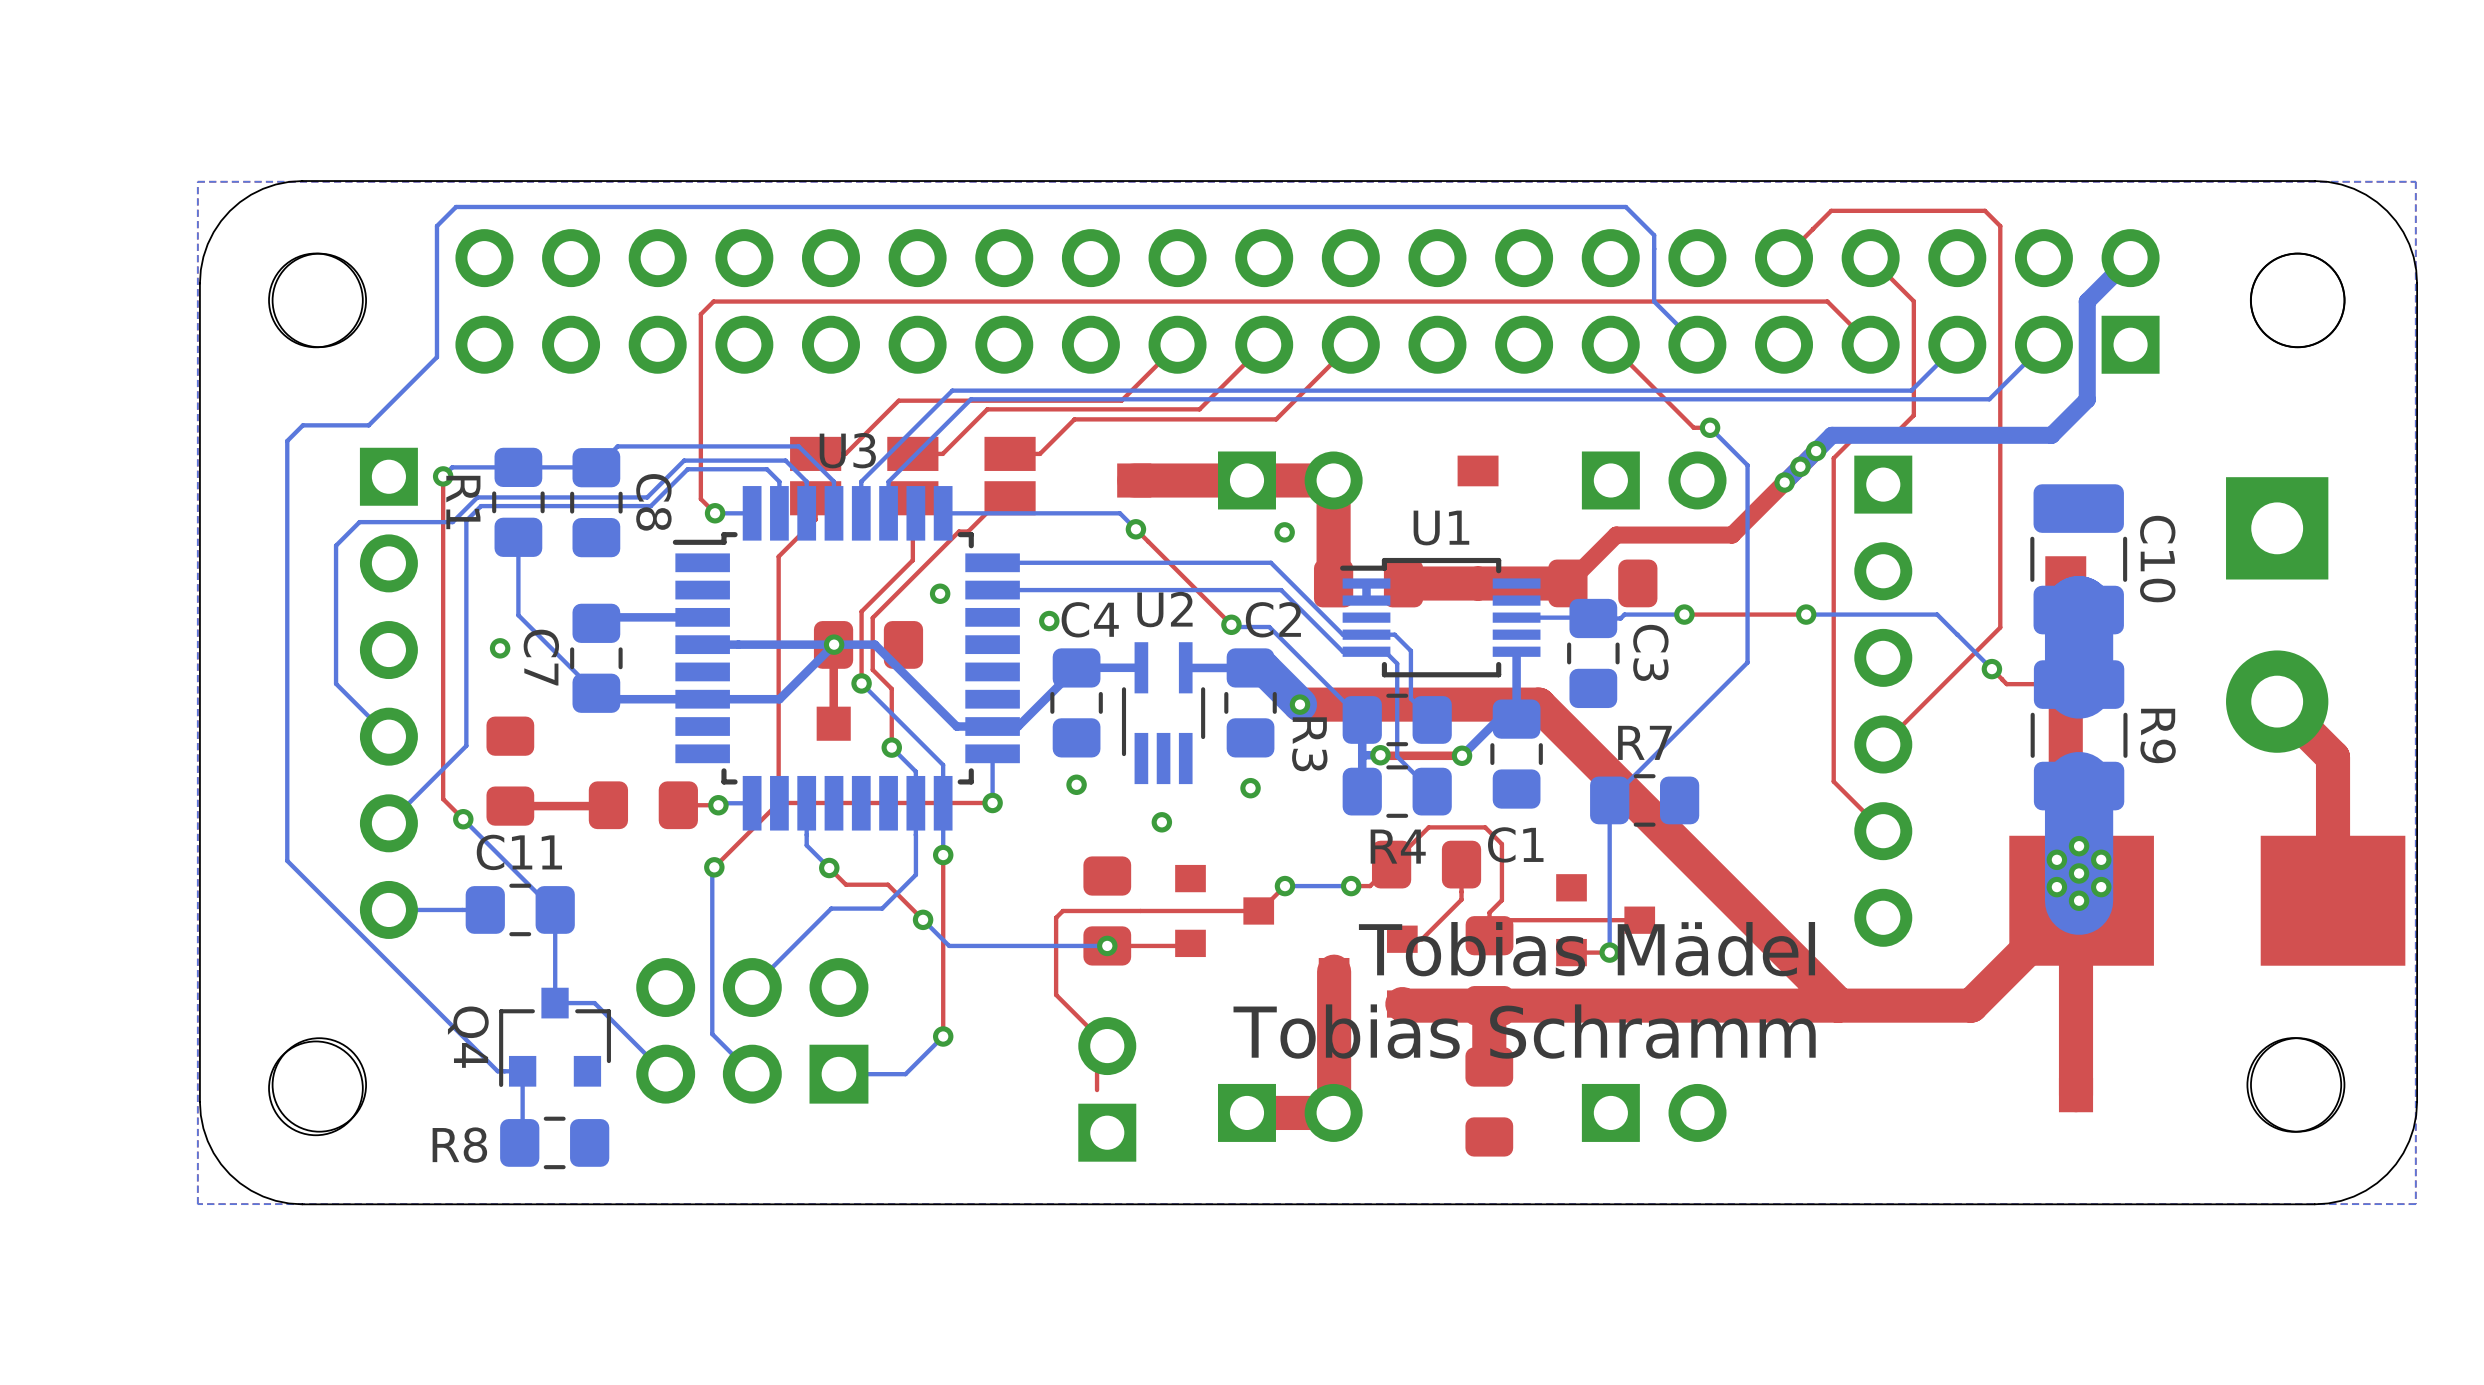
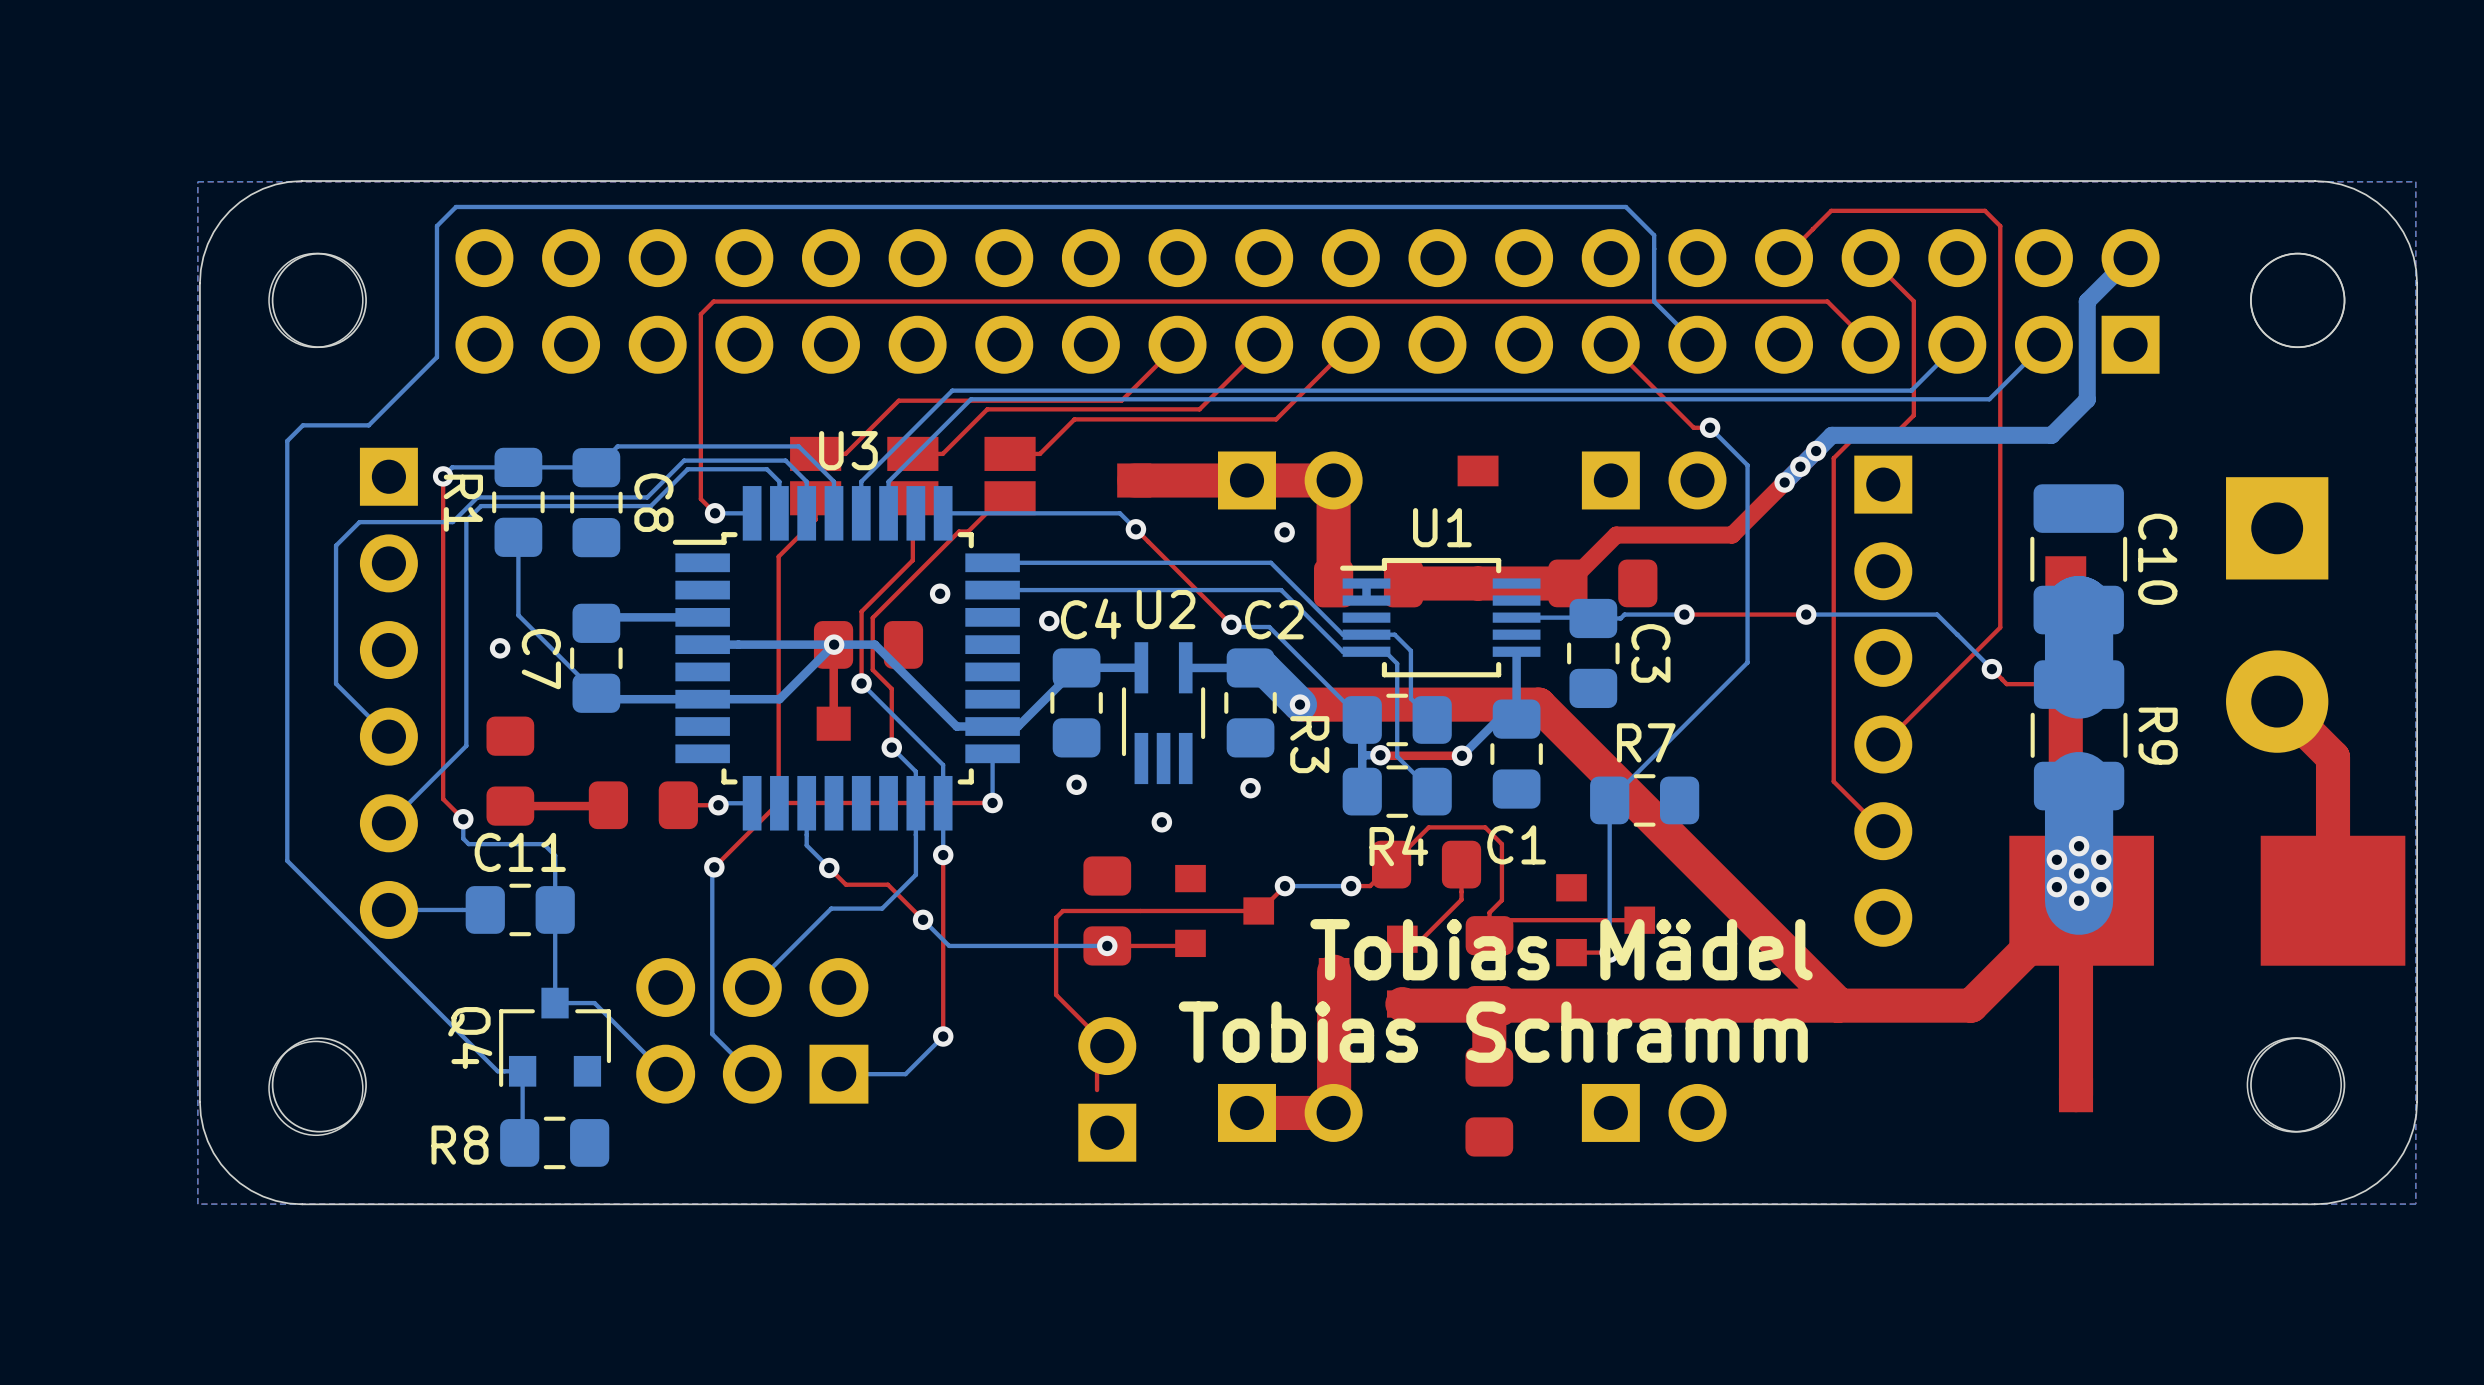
bottom track: (463, 819) (554, 909) -> (463, 819) (463, 838) (468, 844) (543, 844) (555, 855) (555, 909)

